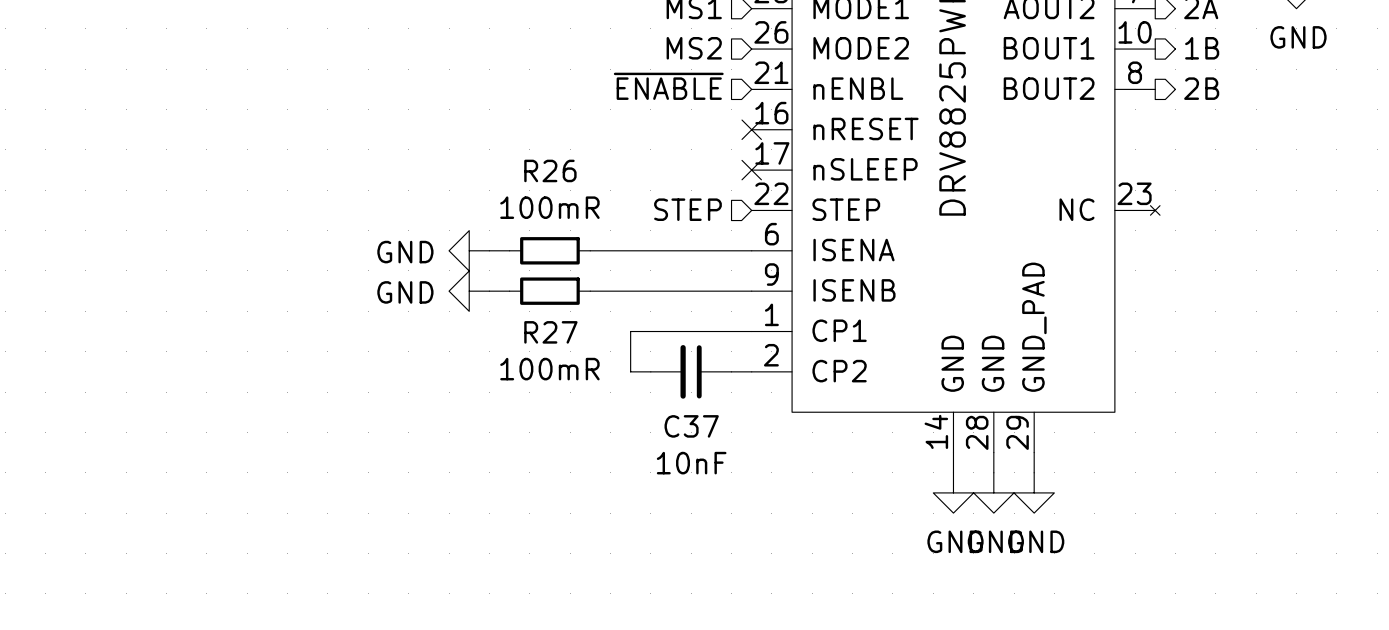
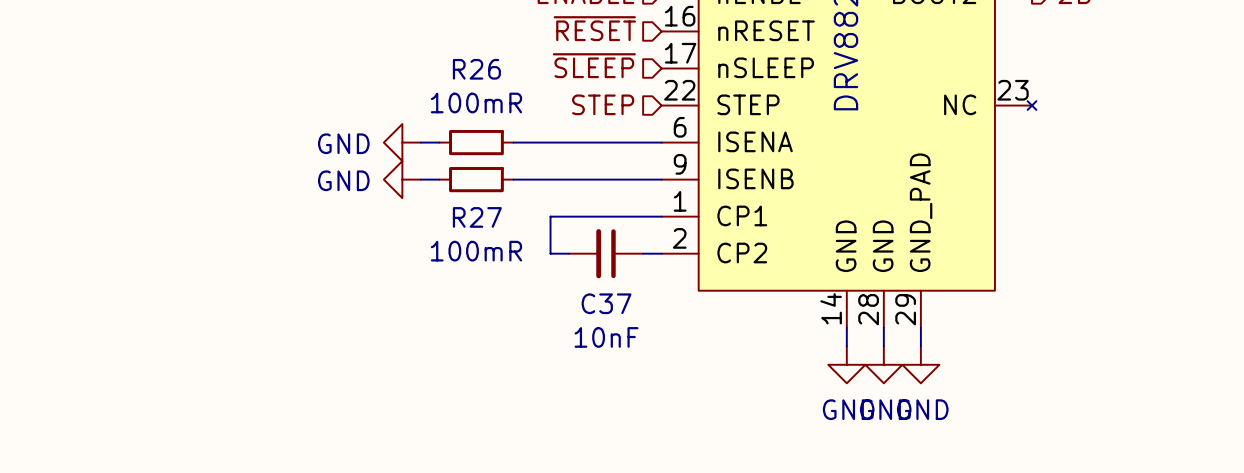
hierarchical label: none -> ~{RESET} (594, 28)
no-connect mark: (751, 129) -> none
hierarchical label: none -> ~{SLEEP} (594, 65)
no-connect mark: (751, 170) -> none

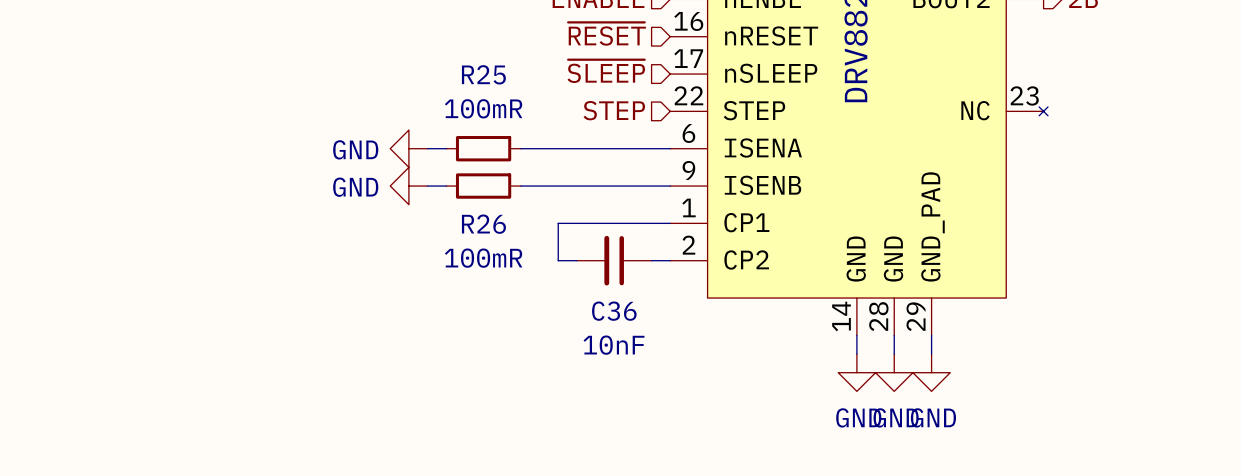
R26 name: R26 (476, 69) -> R25 (483, 74)
R27 name: R27 (477, 217) -> R26 (483, 224)
C37 name: C37 (606, 303) -> C36 (614, 311)

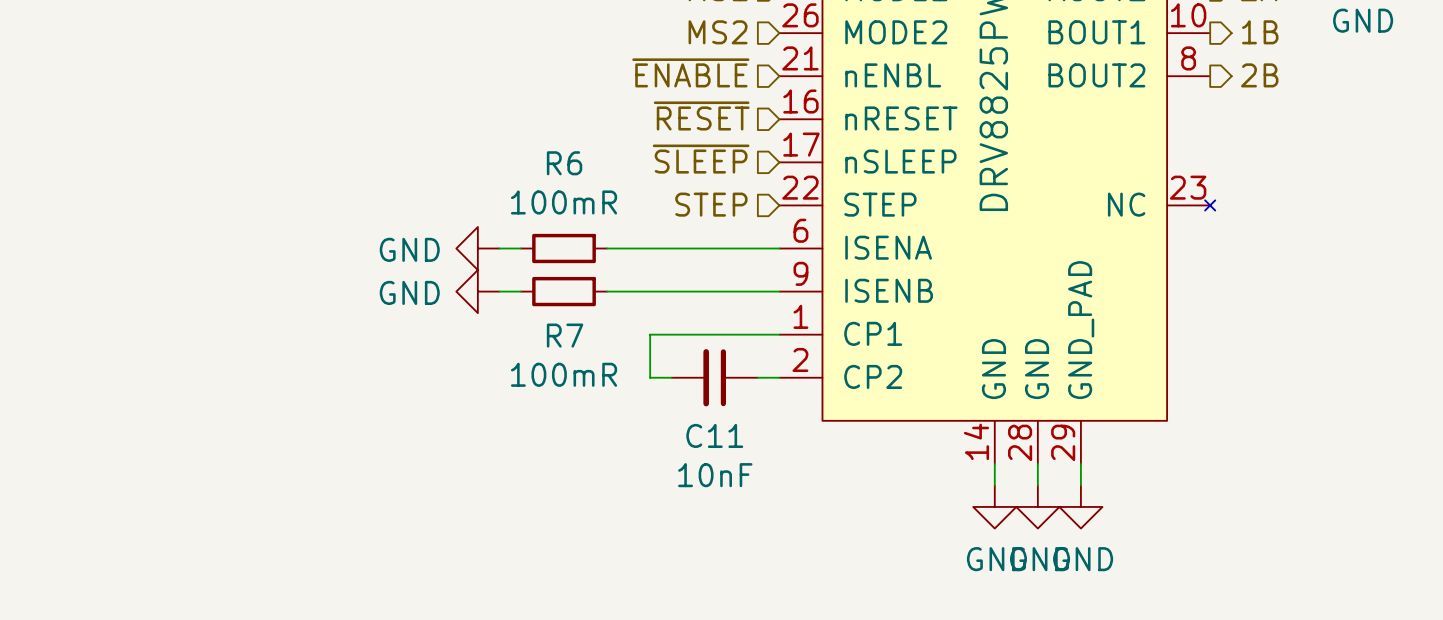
R25 name: R25 (483, 74) -> R6 (564, 163)
R26 name: R26 (483, 224) -> R7 (565, 335)
C36 name: C36 (614, 311) -> C11 (714, 435)

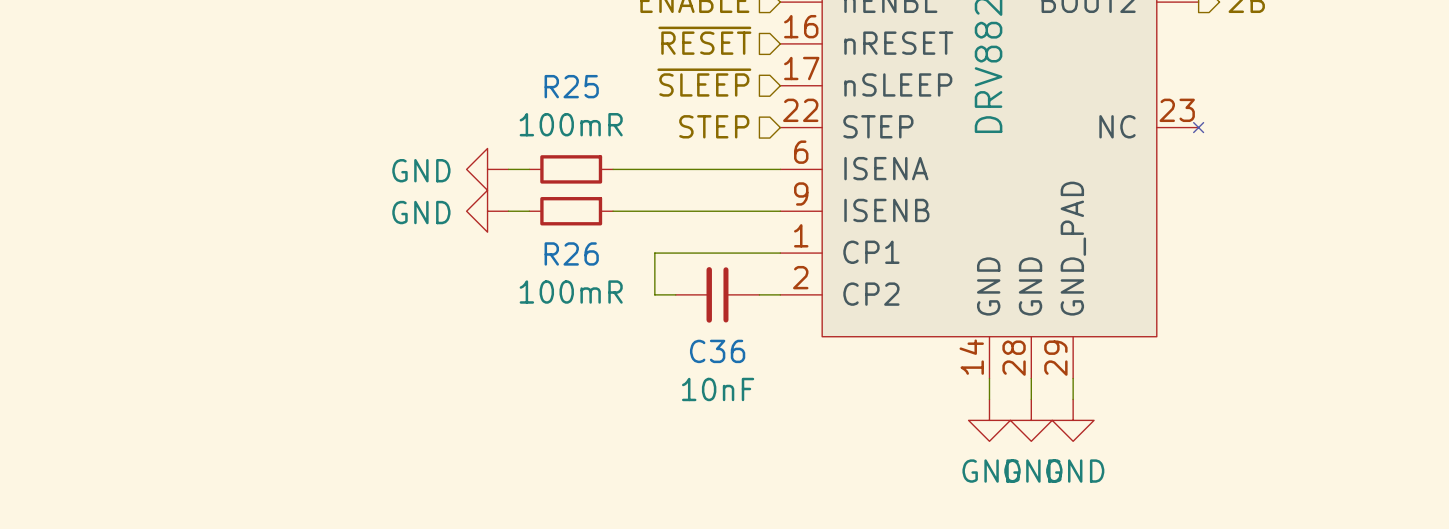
R6 name: R6 (564, 163) -> R25 (571, 86)
R7 name: R7 (565, 335) -> R26 (571, 253)
C11 name: C11 (714, 435) -> C36 (717, 351)

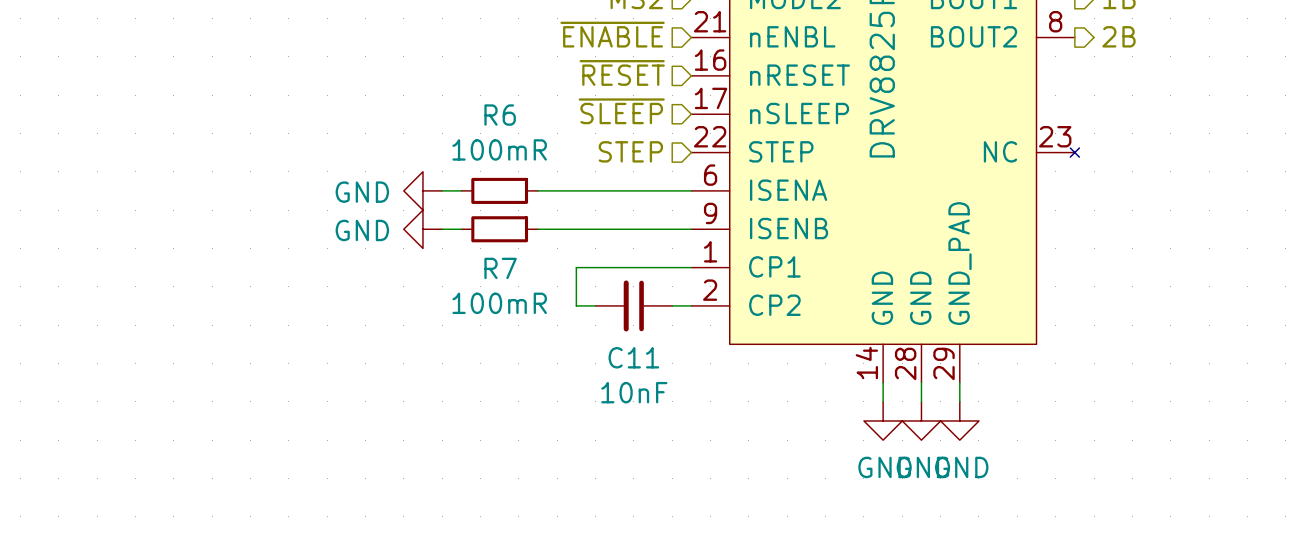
R25 name: R25 (571, 86) -> R6 (500, 115)
R26 name: R26 (571, 253) -> R7 (500, 268)
C36 name: C36 (717, 351) -> C11 (633, 357)

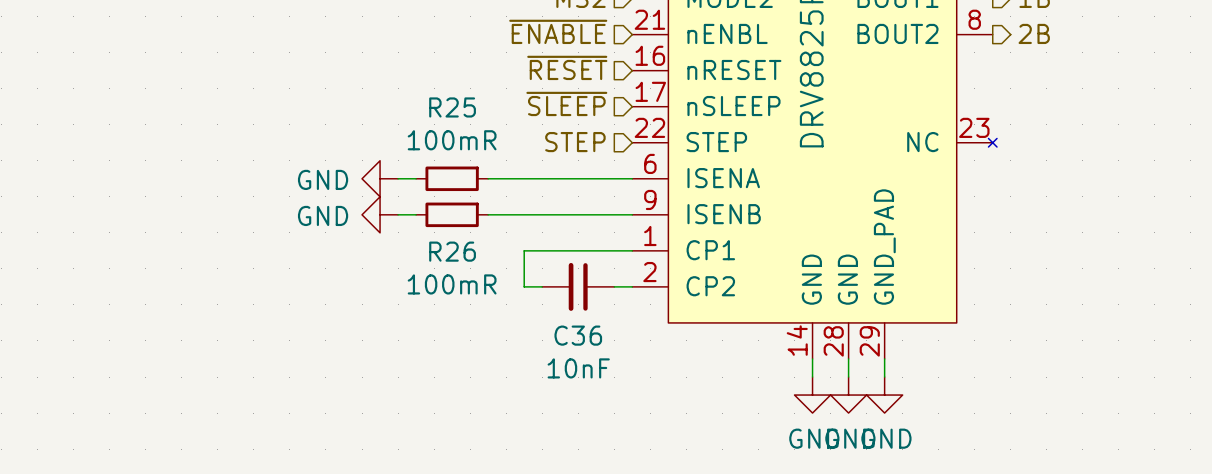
R6 name: R6 (500, 115) -> R25 (452, 107)
R7 name: R7 (500, 268) -> R26 (452, 251)
C11 name: C11 (633, 357) -> C36 (578, 335)

